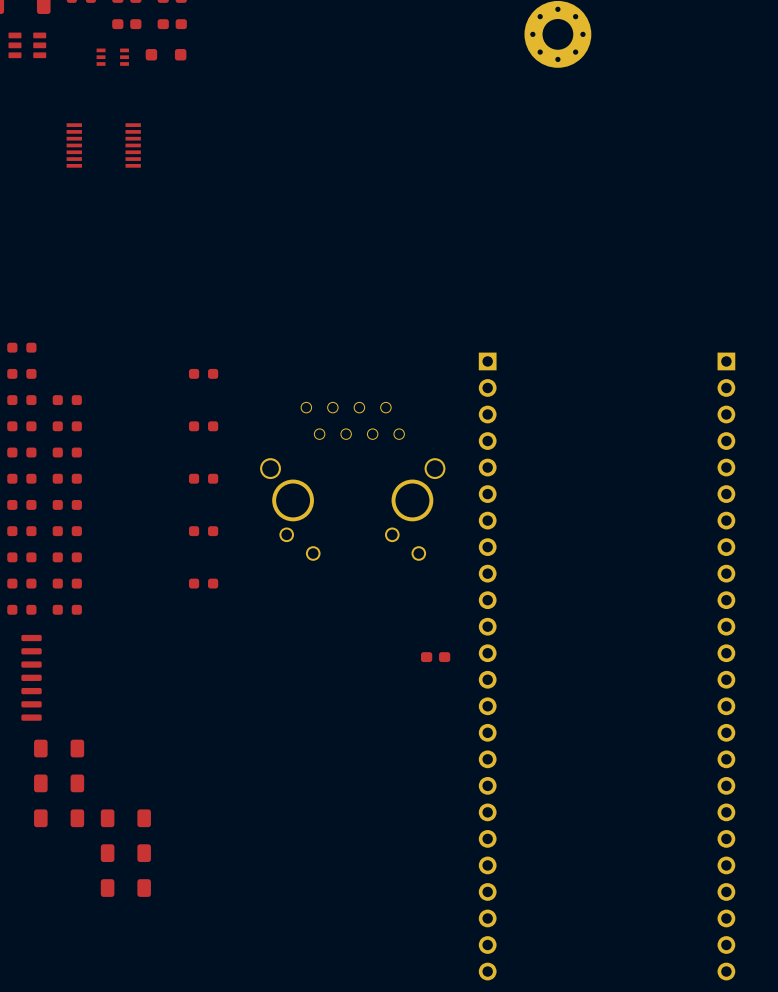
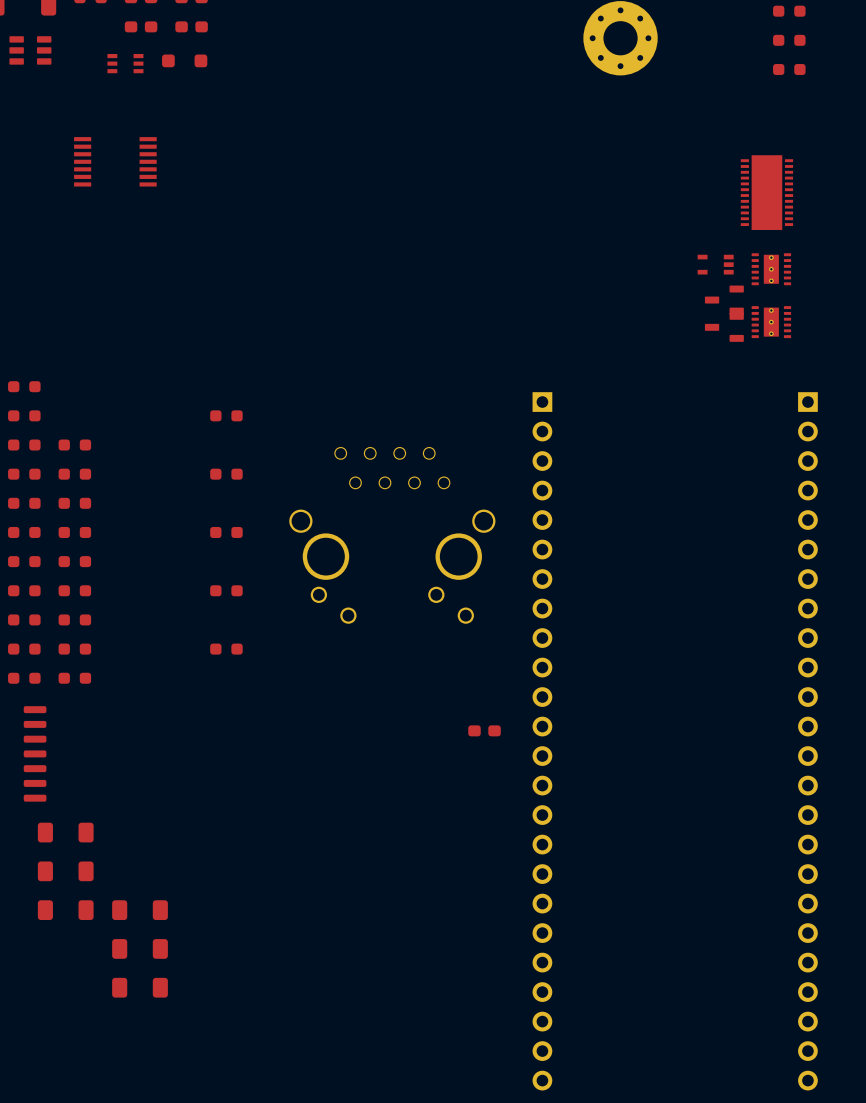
part: none -> (789, 11)
part: none -> (789, 40)
part: none -> (789, 69)
part: none -> (766, 192)
part: none -> (715, 264)
part: none -> (771, 269)
part: none -> (724, 300)
part: none -> (771, 322)
part: none -> (724, 327)

